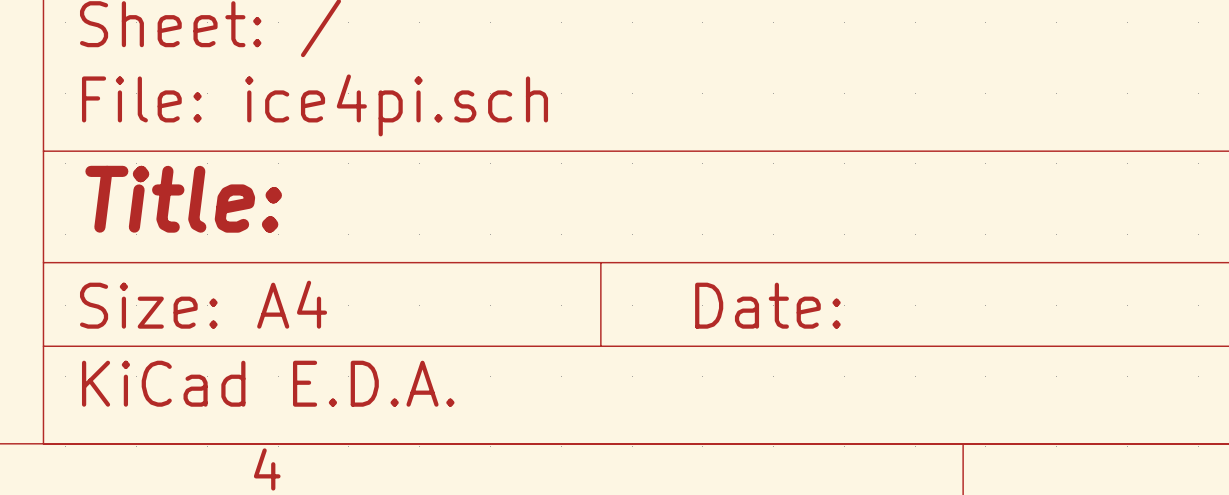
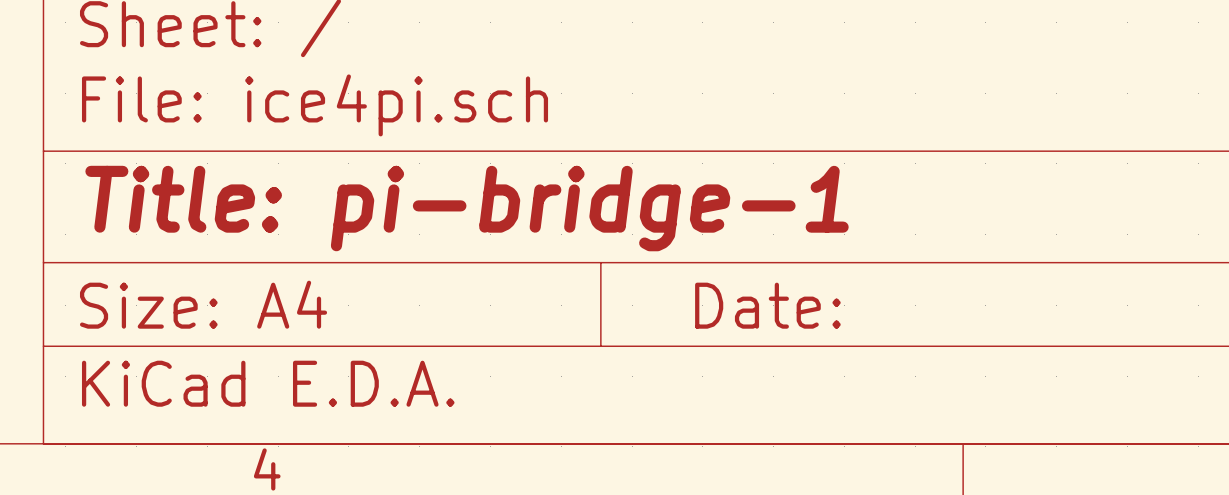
title block: Title: (183, 199) -> Title: pi-bridge-1 (467, 208)

